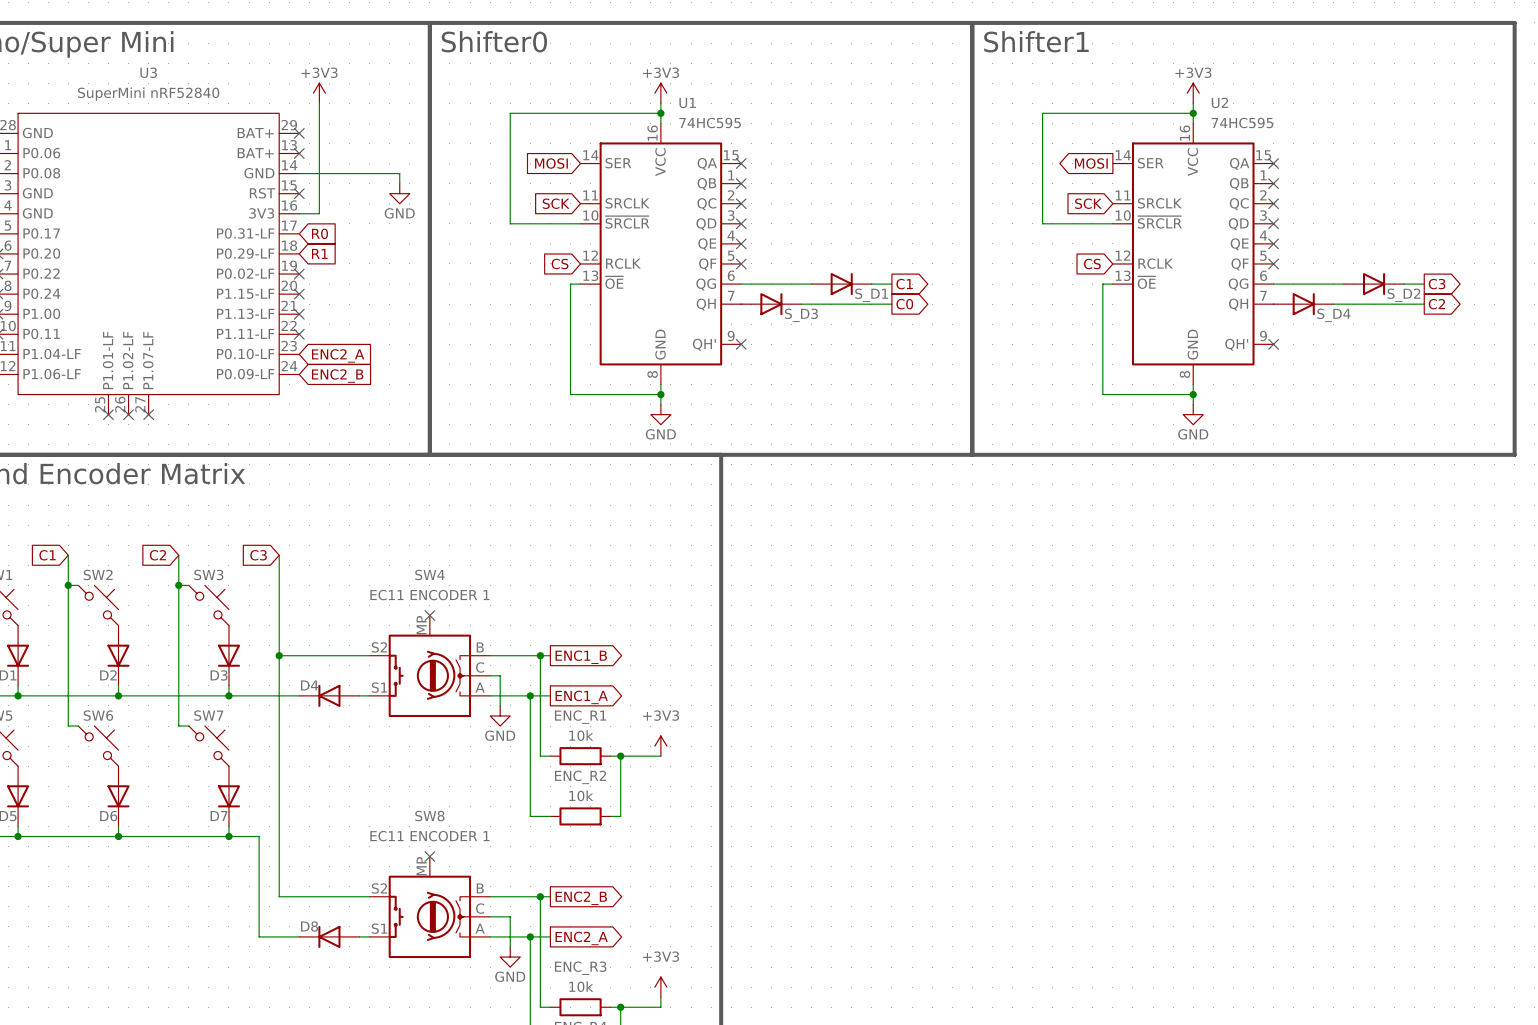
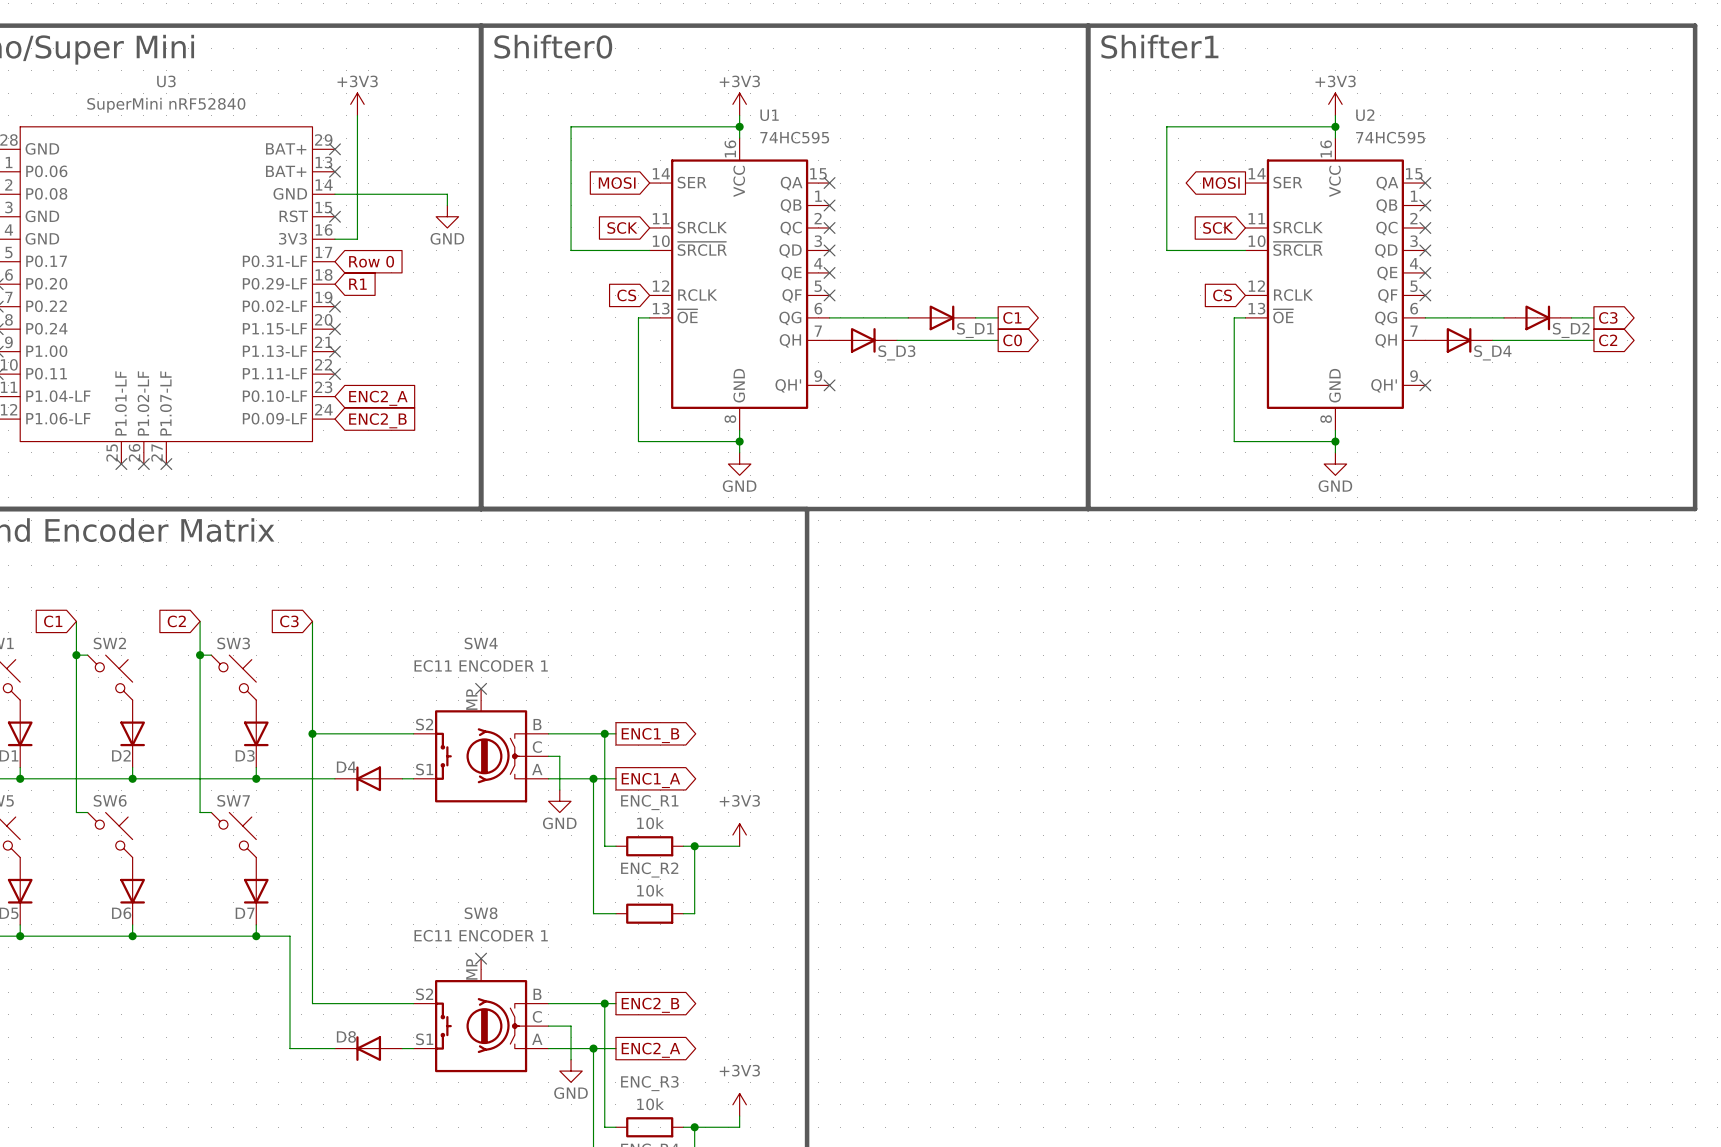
global label: R0 (319, 233) -> Row 0 (371, 261)

